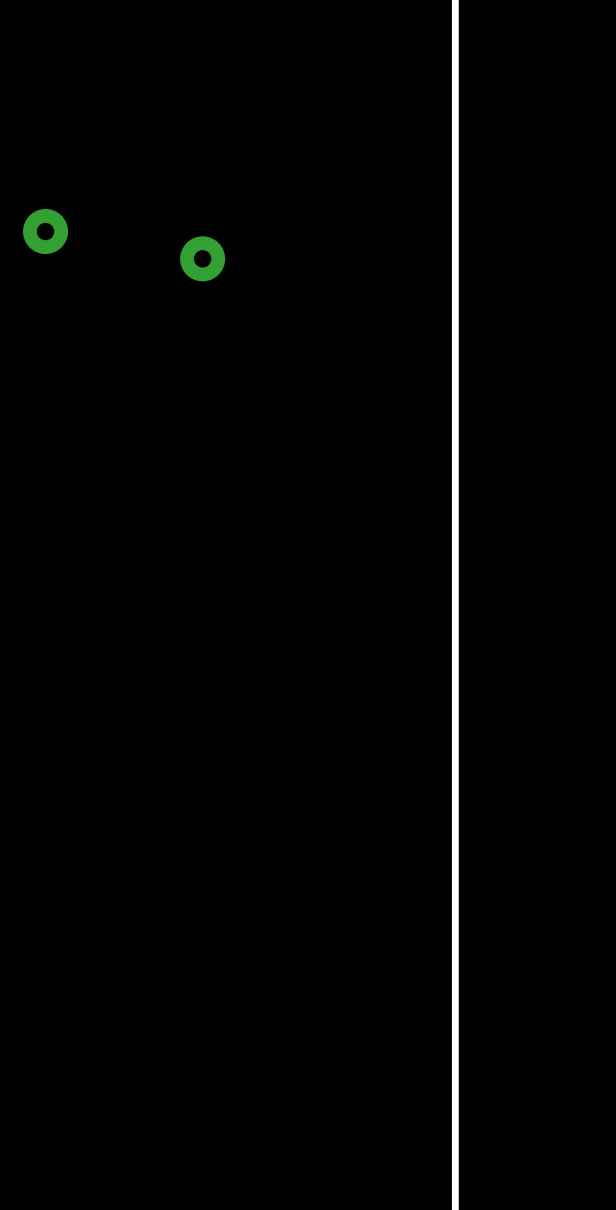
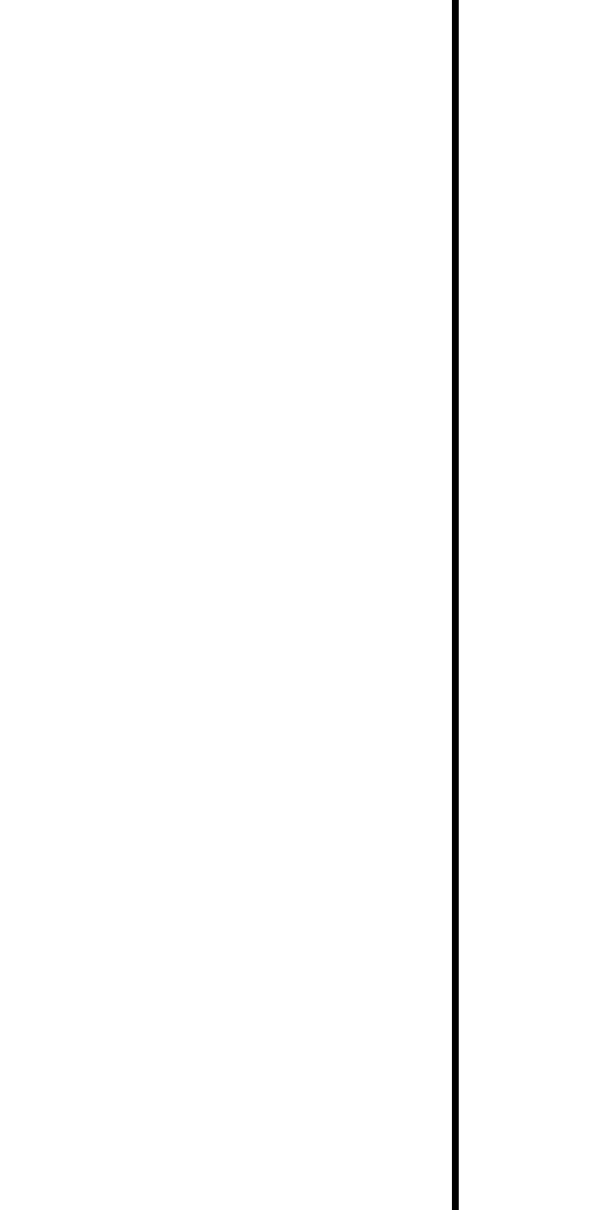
via: (45, 231) -> none
via: (202, 258) -> none

